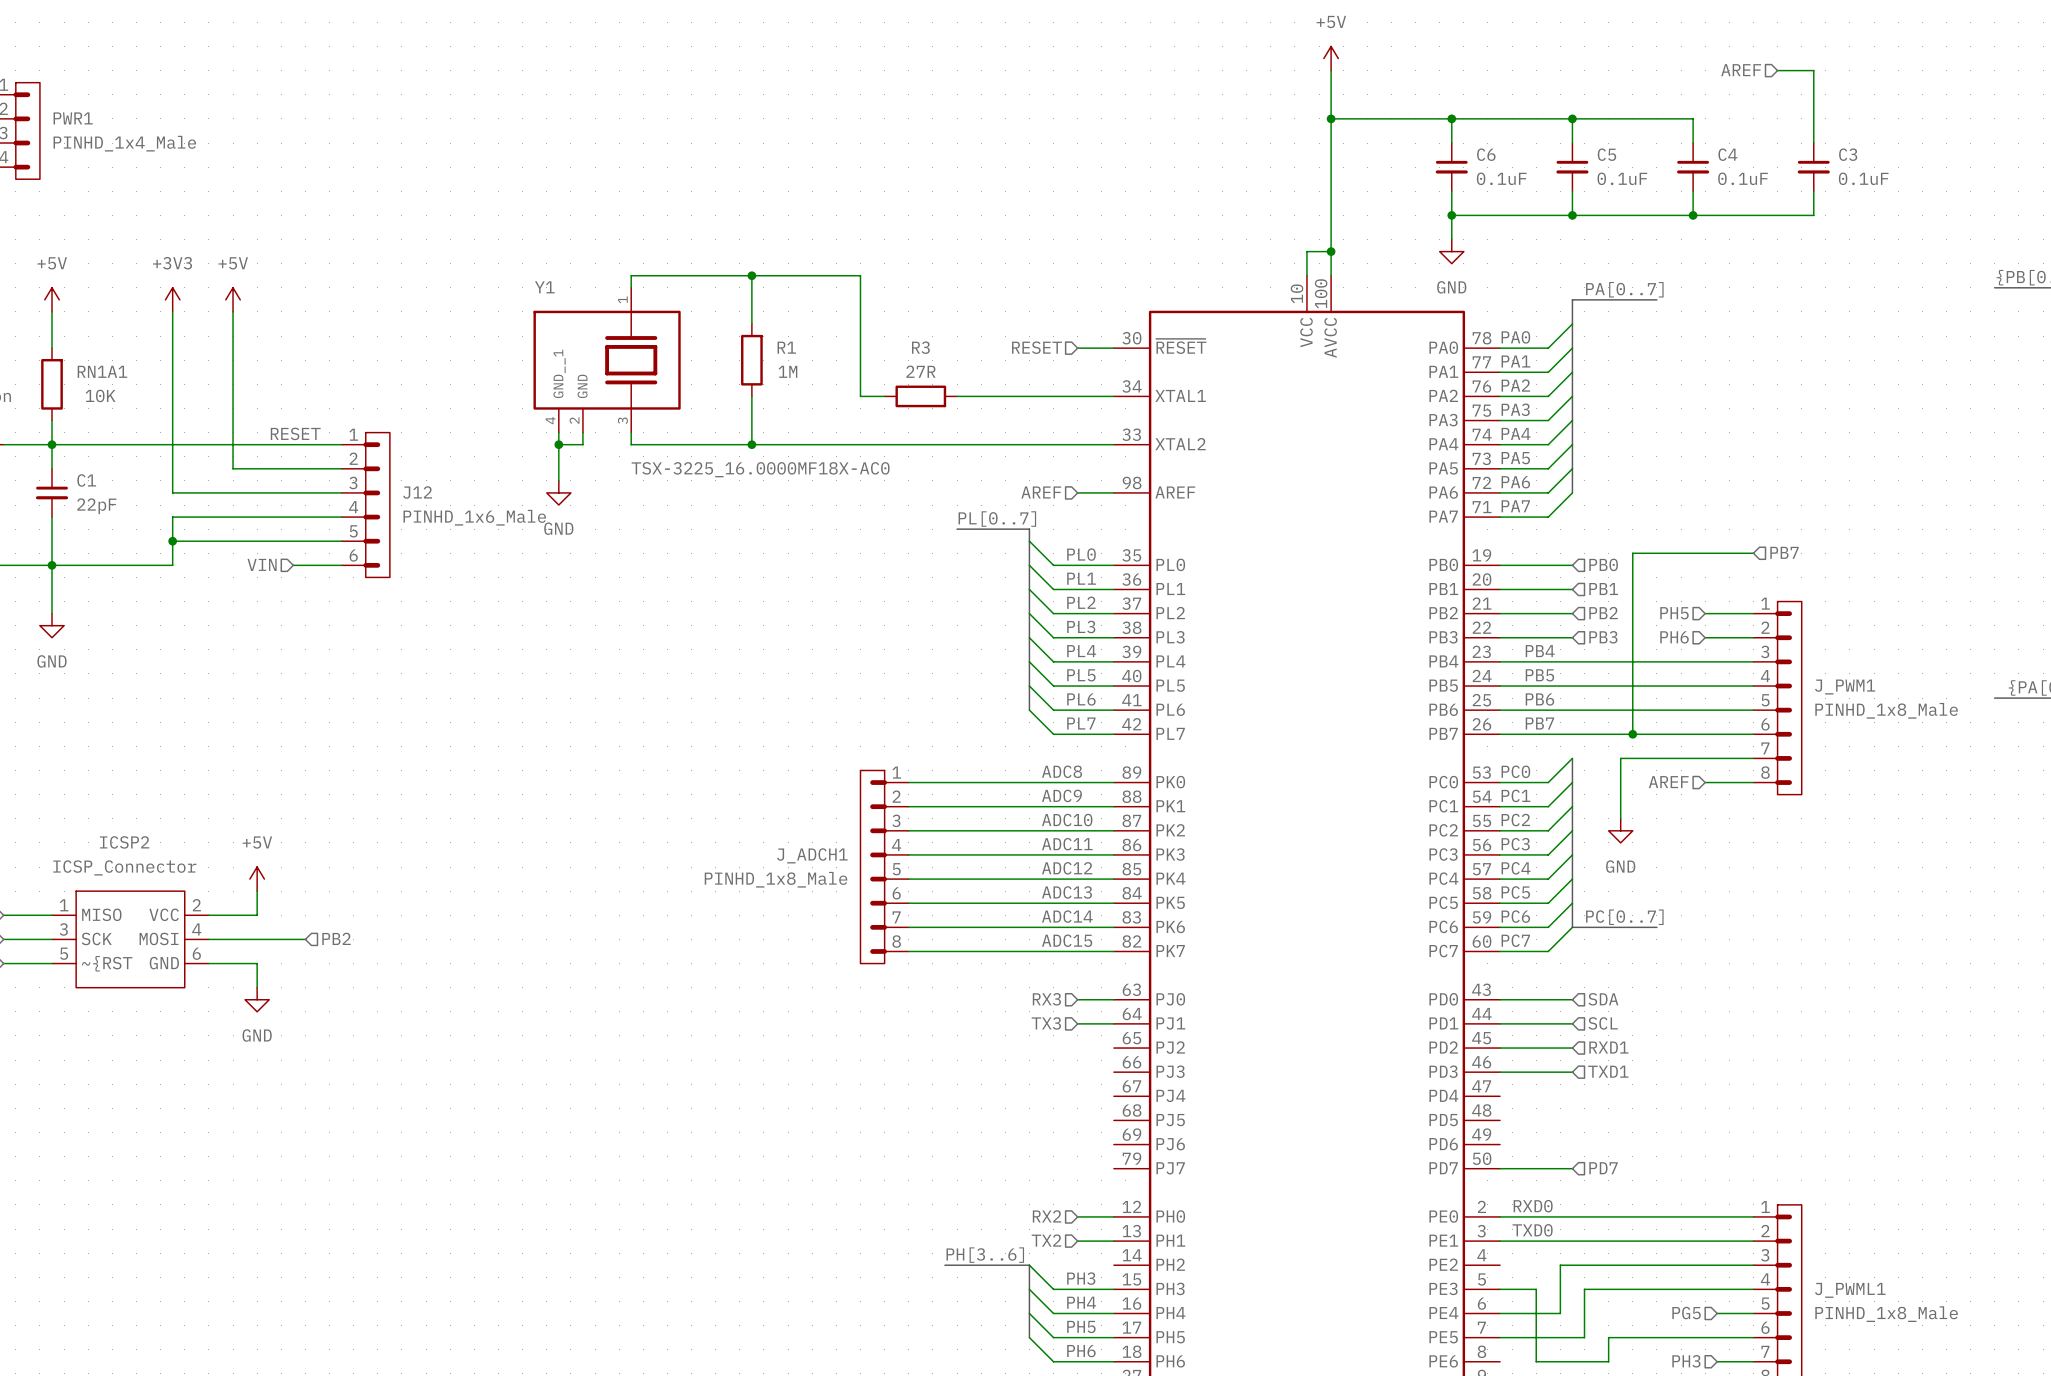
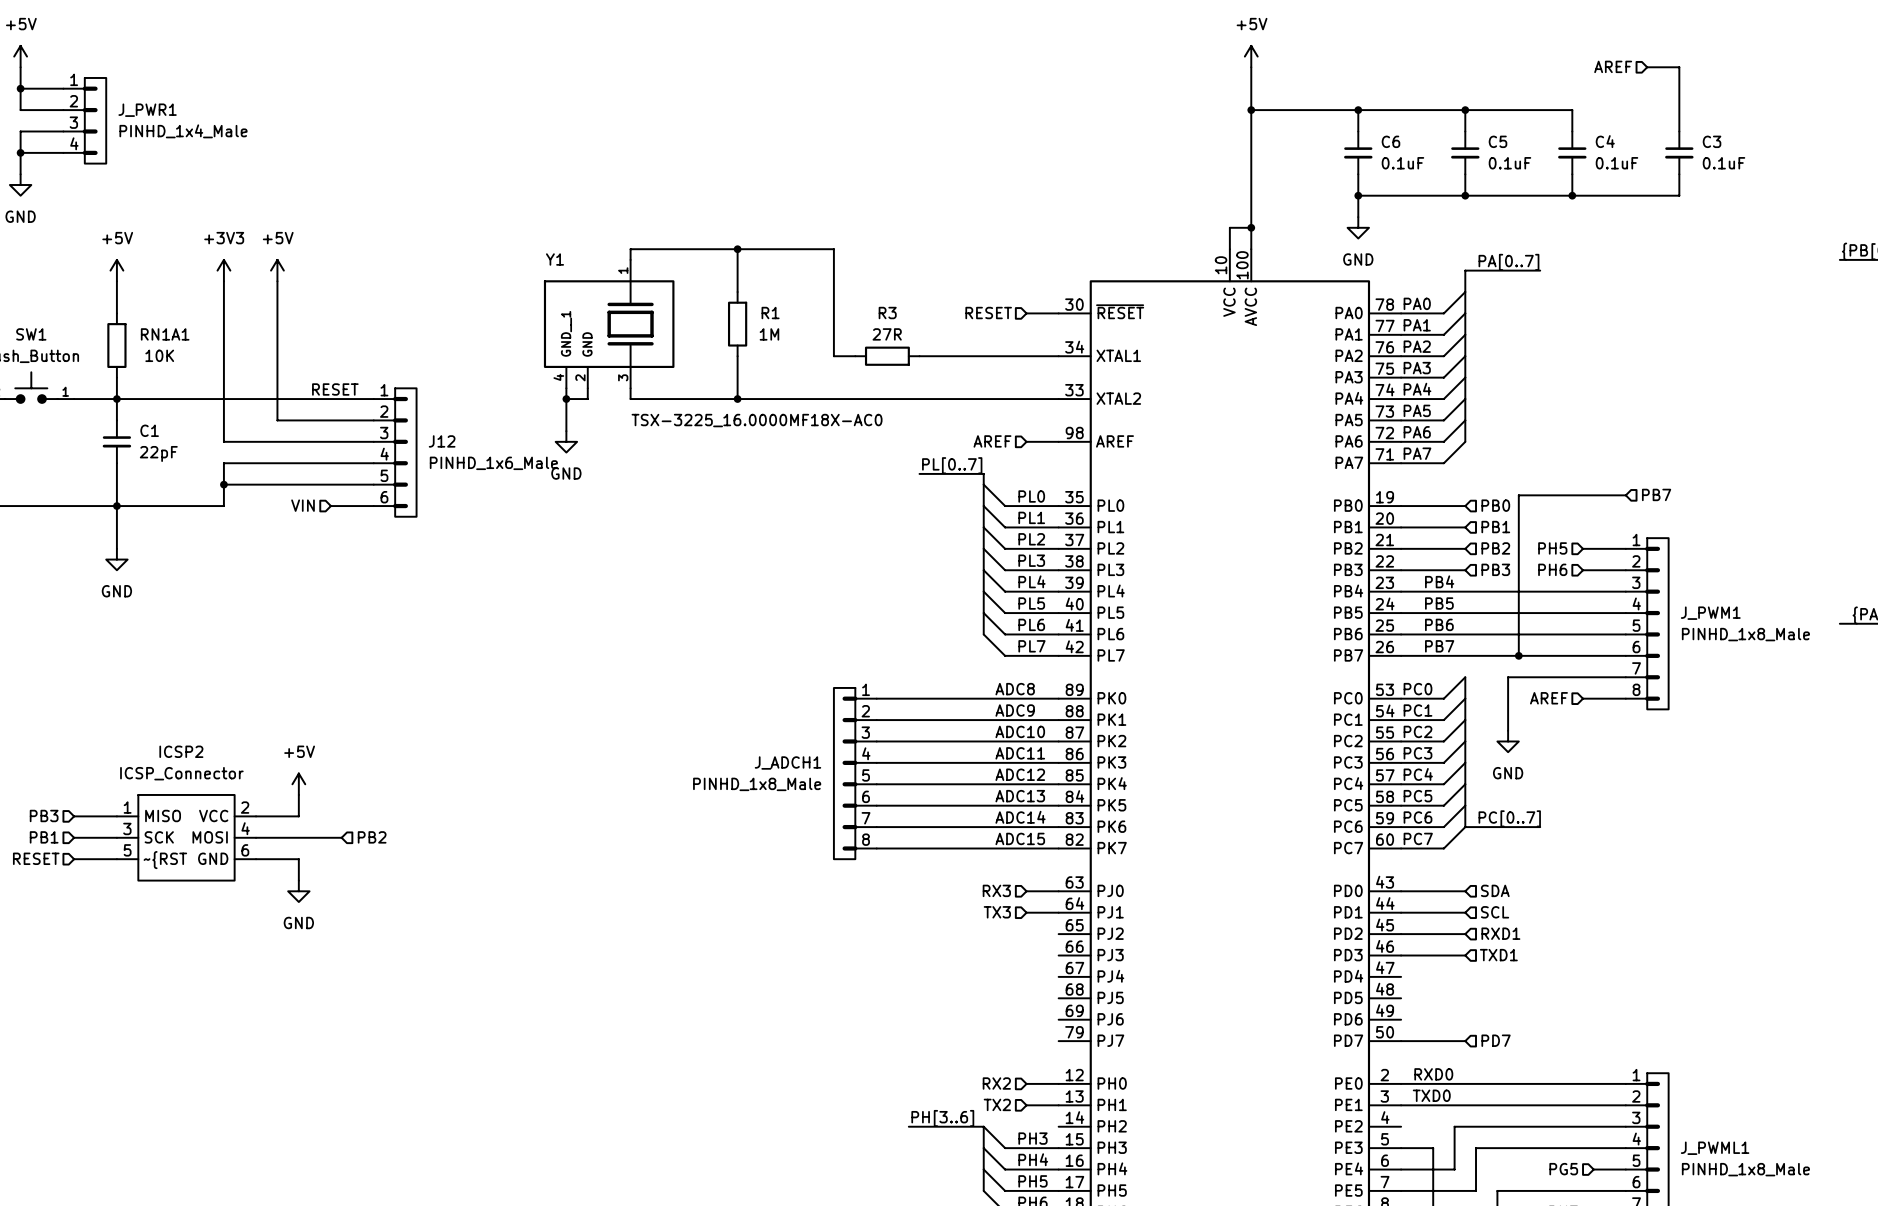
PWR1 name: PWR1 (73, 118) -> J_PWR1 (147, 110)

